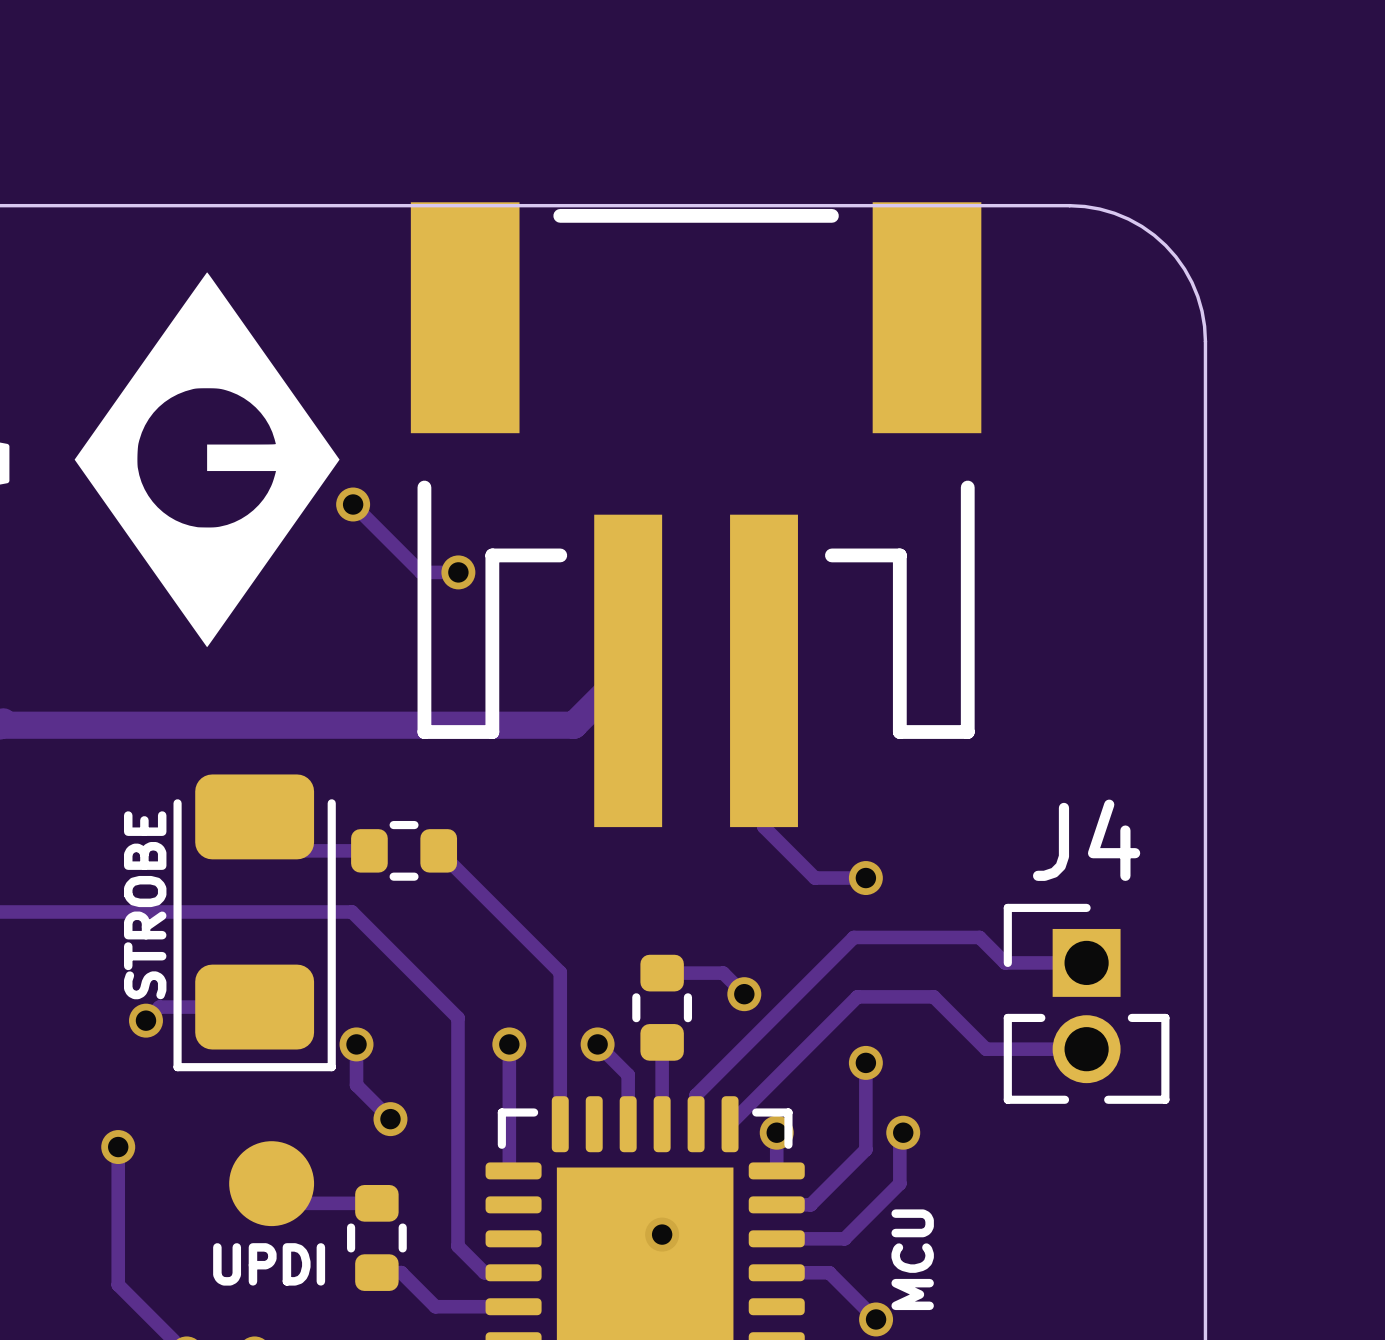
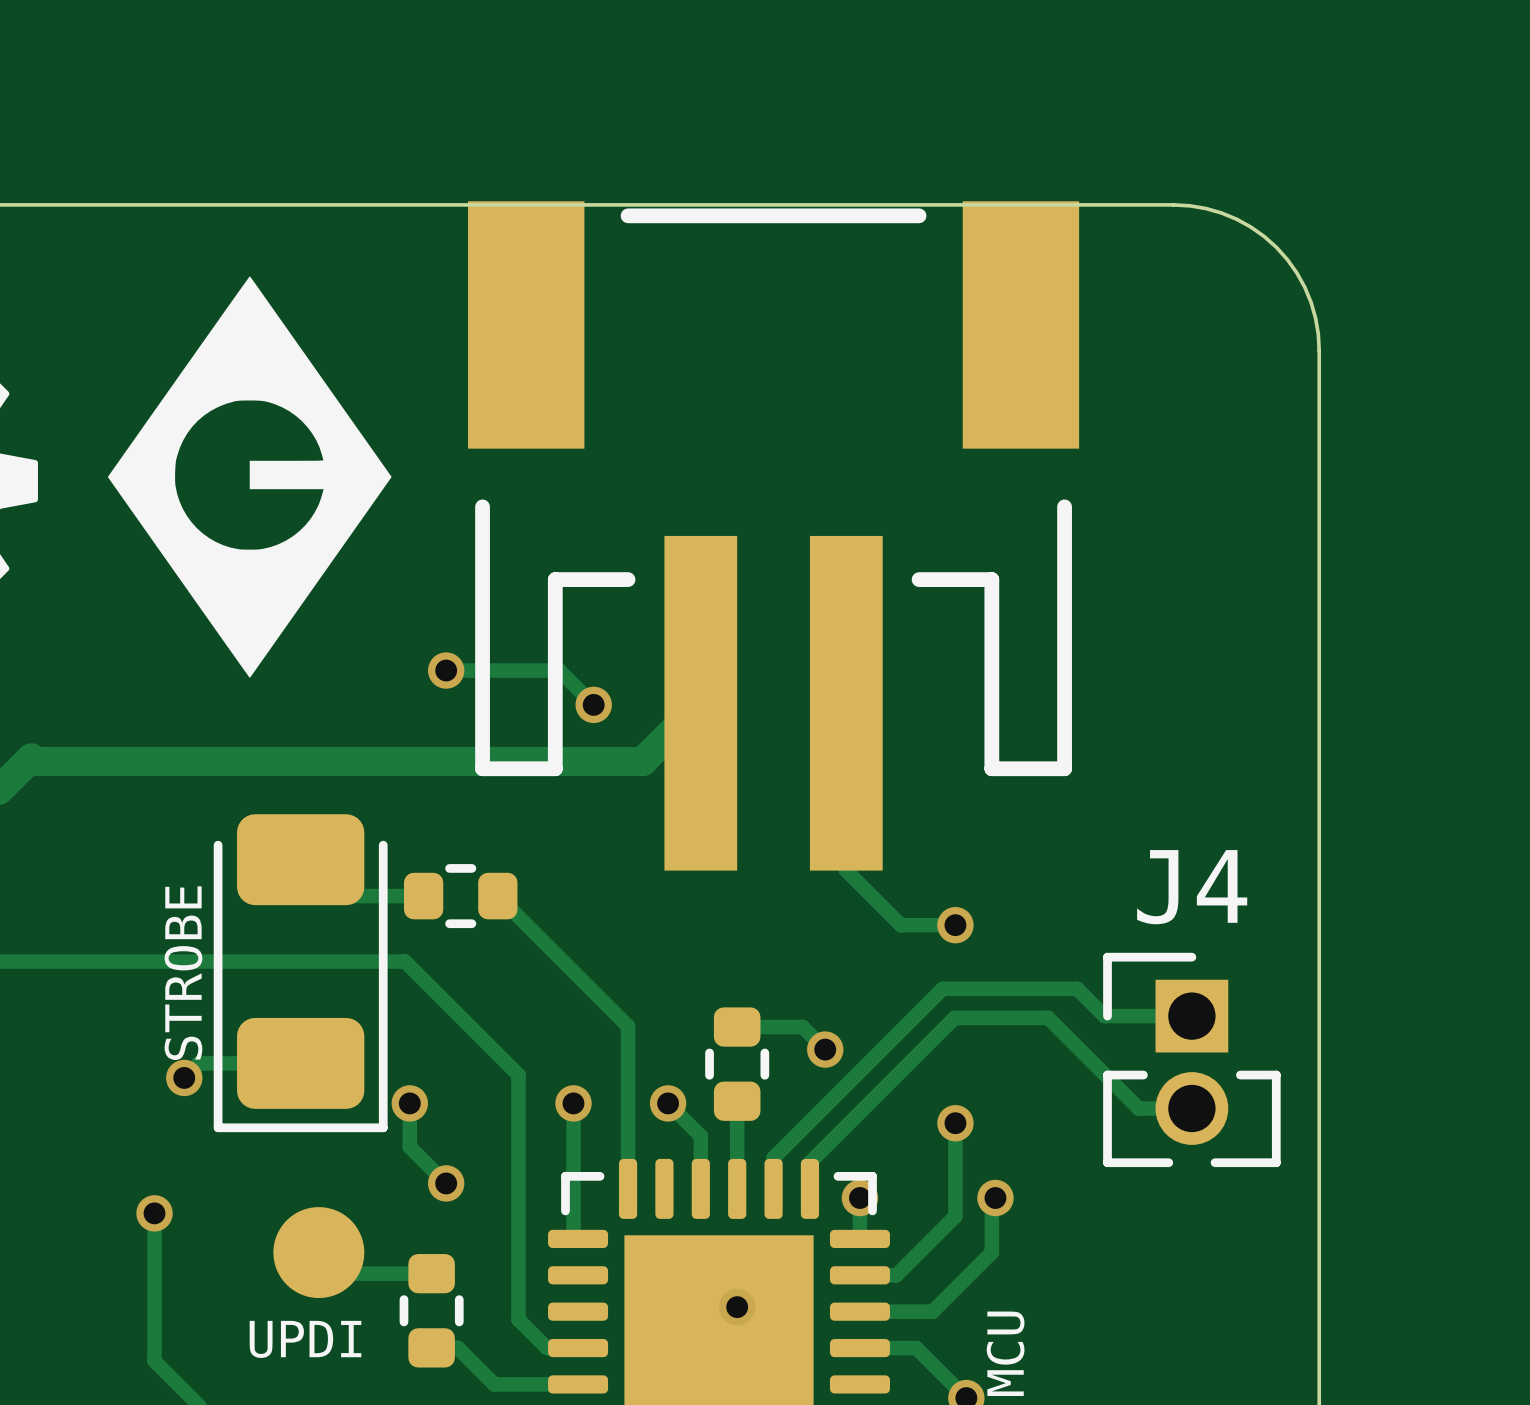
track: (353, 504) (421, 572) (458, 572) -> none
via: (353, 504) -> none
via: (458, 572) -> none
track: none -> (446, 670) (559, 670) (593, 704)
via: none -> (446, 670)
via: none -> (593, 704)
track: (1037, 1049) (986, 1049) (933, 996) (857, 996) (730, 1124) -> (1138, 1108) (1048, 1017) (954, 1017) (809, 1162) (809, 1188)

